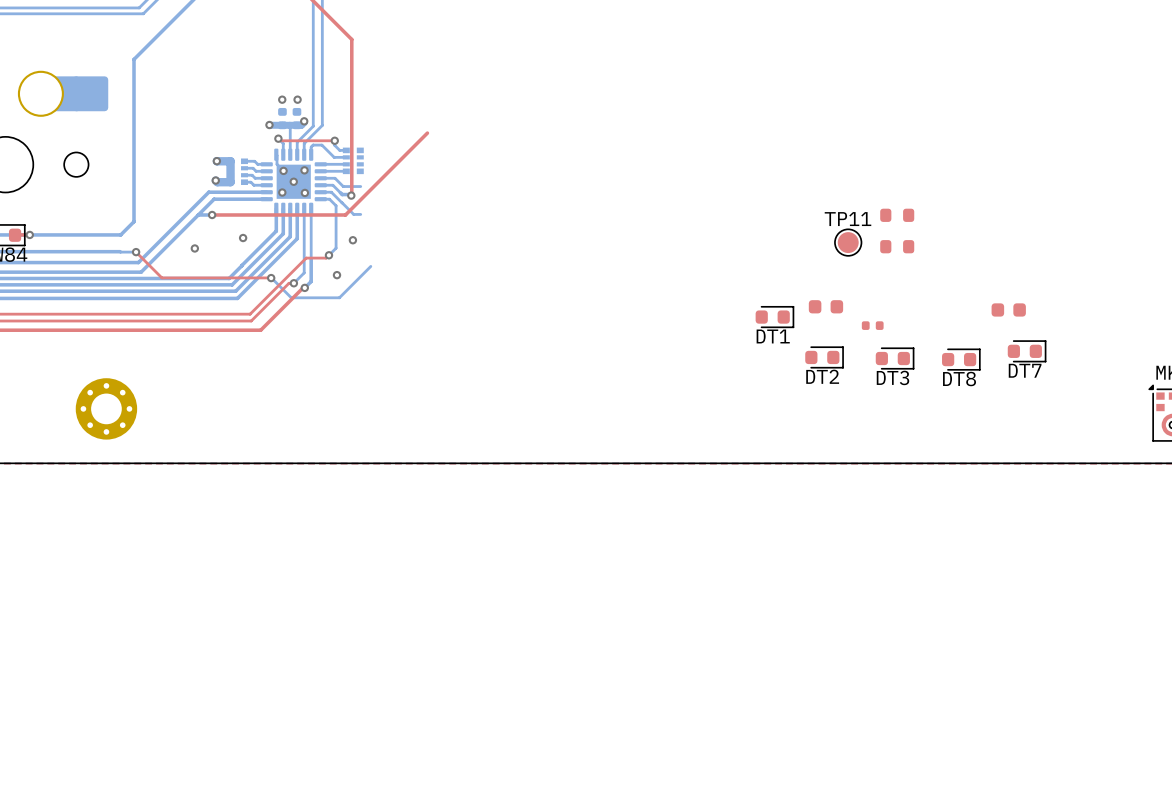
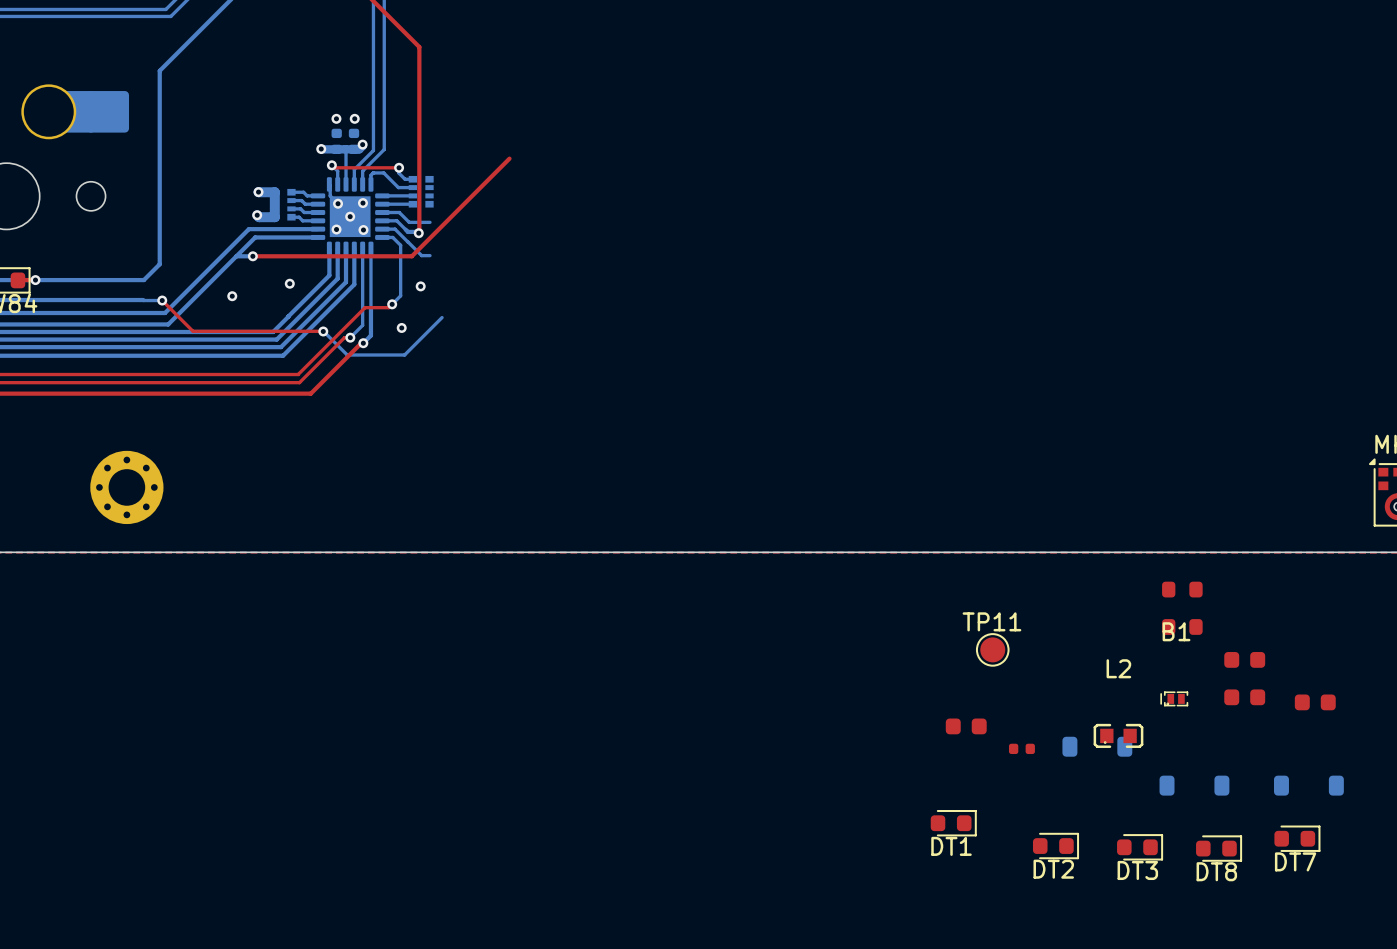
part: (897, 215) -> none
TP11 position: (848, 242) -> (992, 649)
part: (897, 246) -> none
part: (825, 306) -> none
part: (1008, 309) -> none
DT1 position: (774, 317) -> (953, 823)
part position: (872, 325) -> (1021, 748)
DT7 position: (1027, 351) -> (1297, 838)
DT2 position: (824, 357) -> (1056, 846)
DT3 position: (895, 358) -> (1140, 847)
DT8 position: (961, 359) -> (1219, 848)
part: none -> (1182, 589)
part: none -> (1182, 626)
part: none -> (1244, 659)
part: none -> (1244, 697)
B1: none -> (1174, 698)
part: none -> (1315, 702)
part: none -> (966, 726)
L2: none -> (1118, 735)
part: none -> (1097, 746)
part: none -> (1194, 785)
part: none -> (1308, 785)

